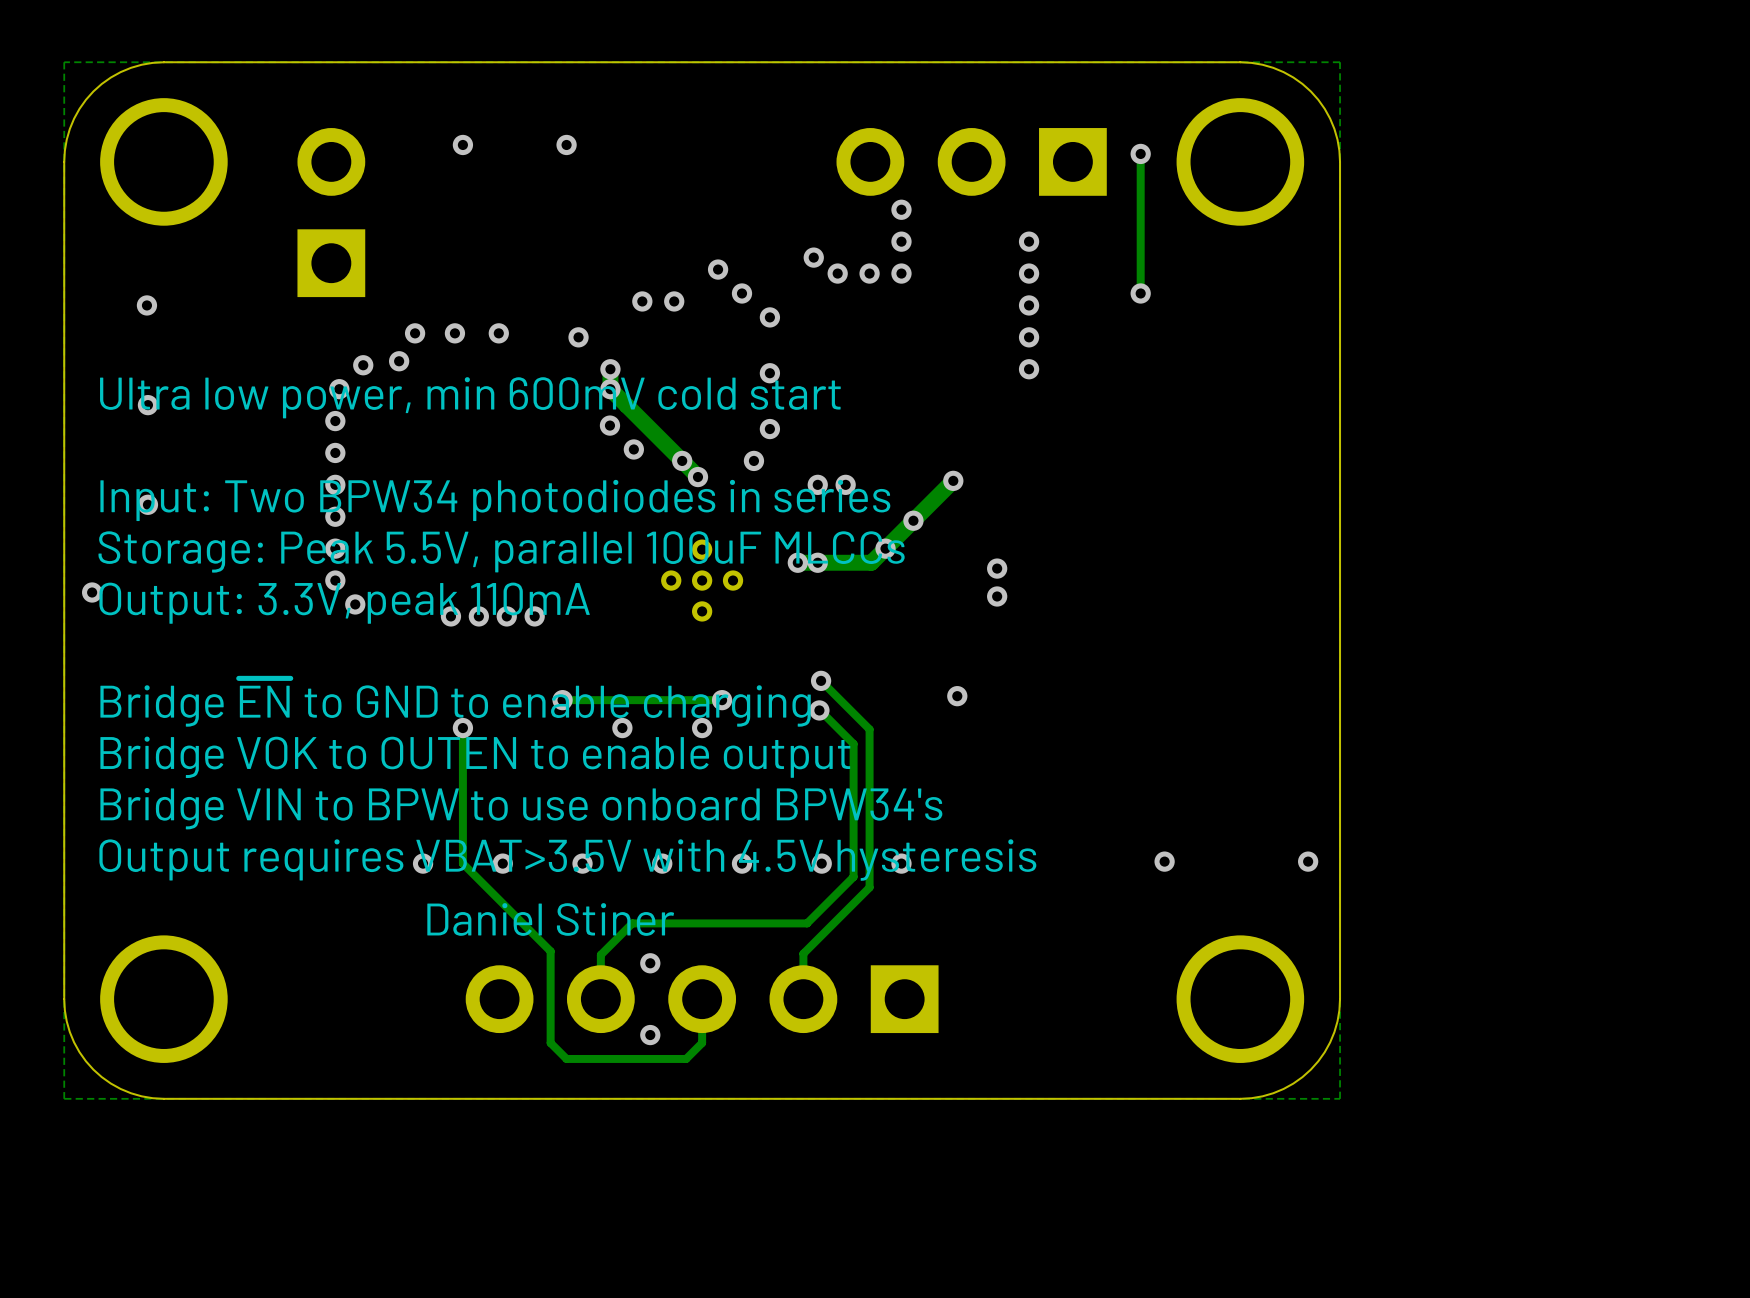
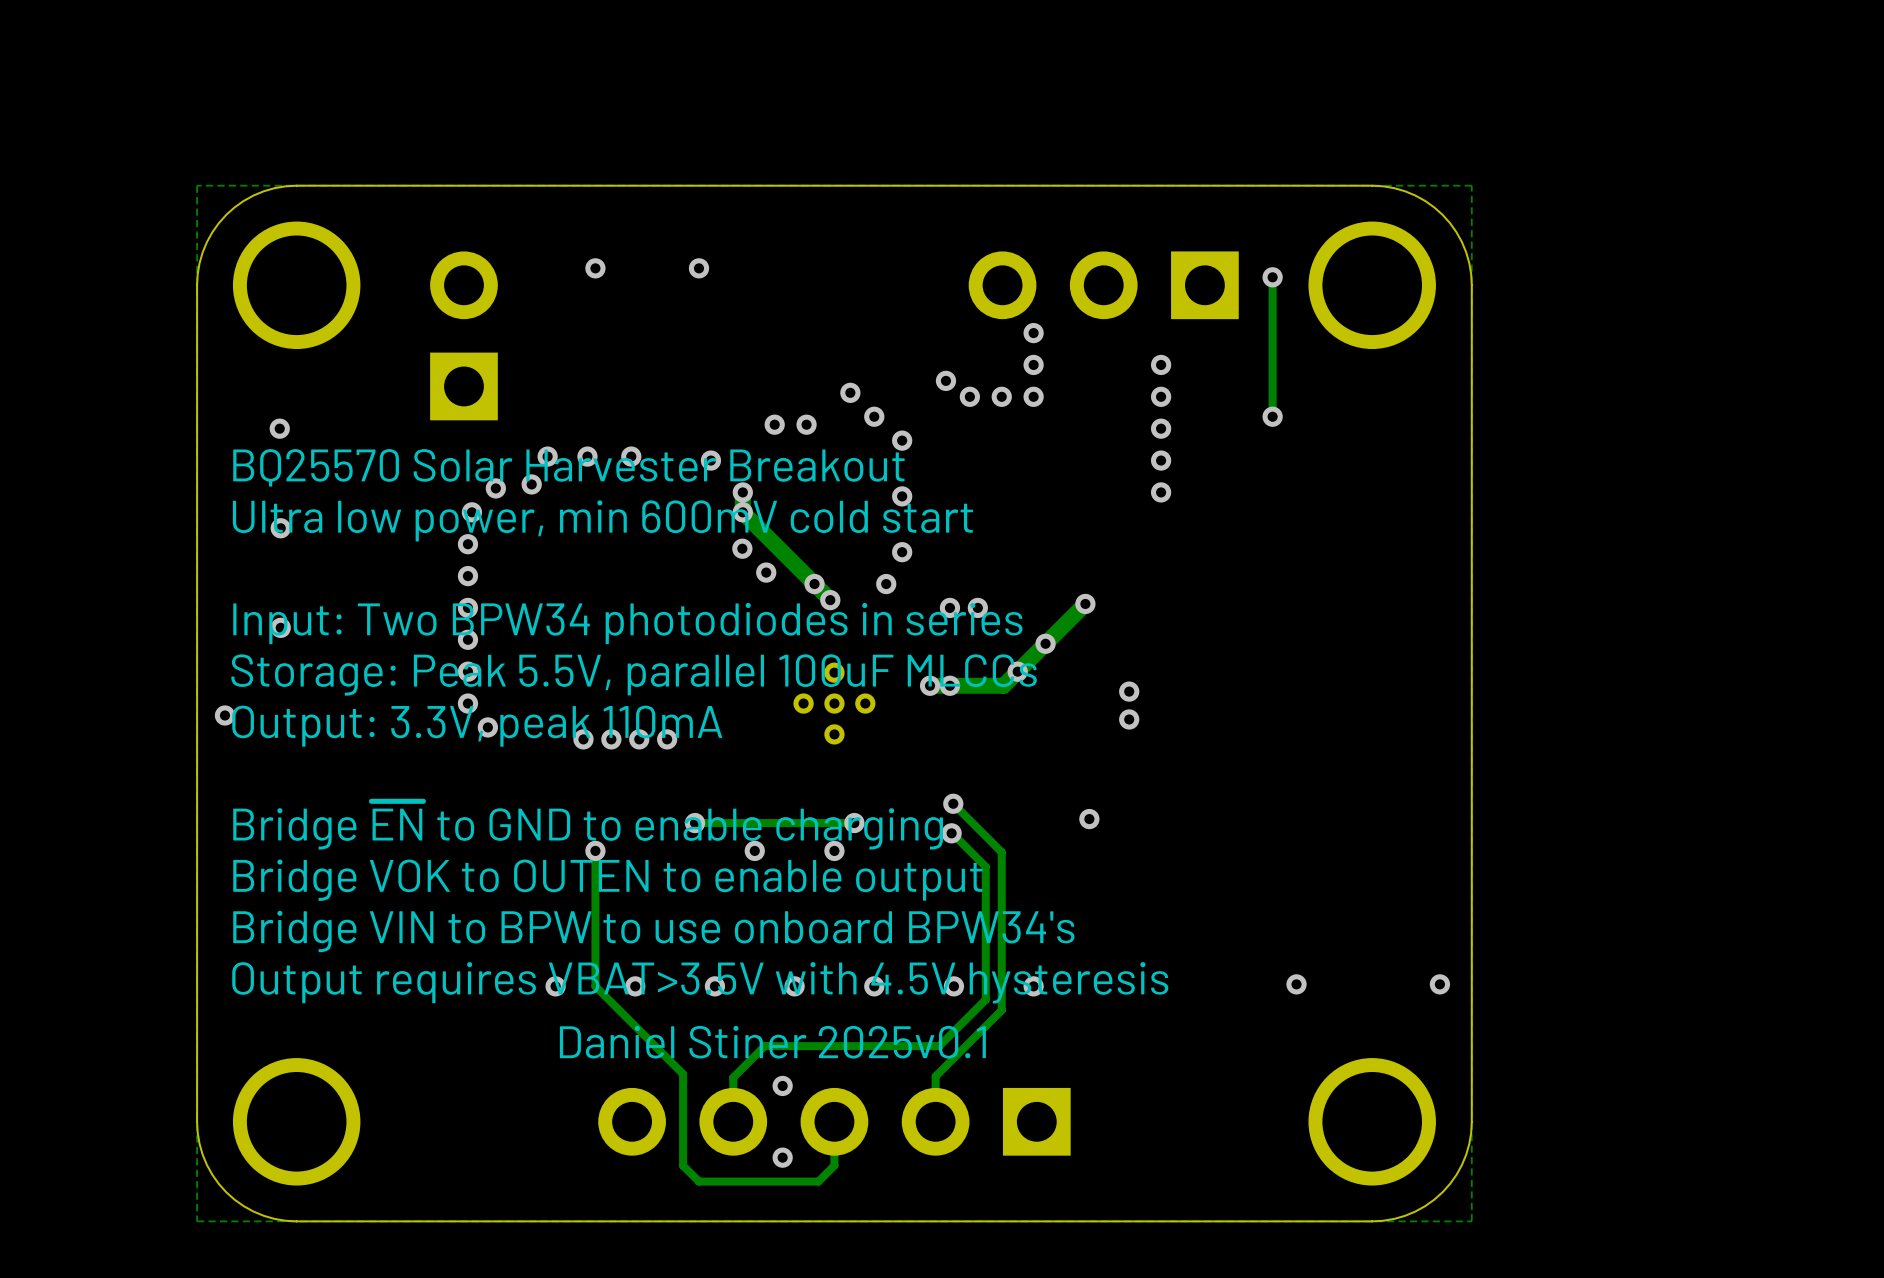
text: none -> BQ25570 Solar Harvester Breakout (568, 467)
text: Daniel Stiner (550, 919) -> Daniel Stiner 2025v0.1 (772, 1042)

